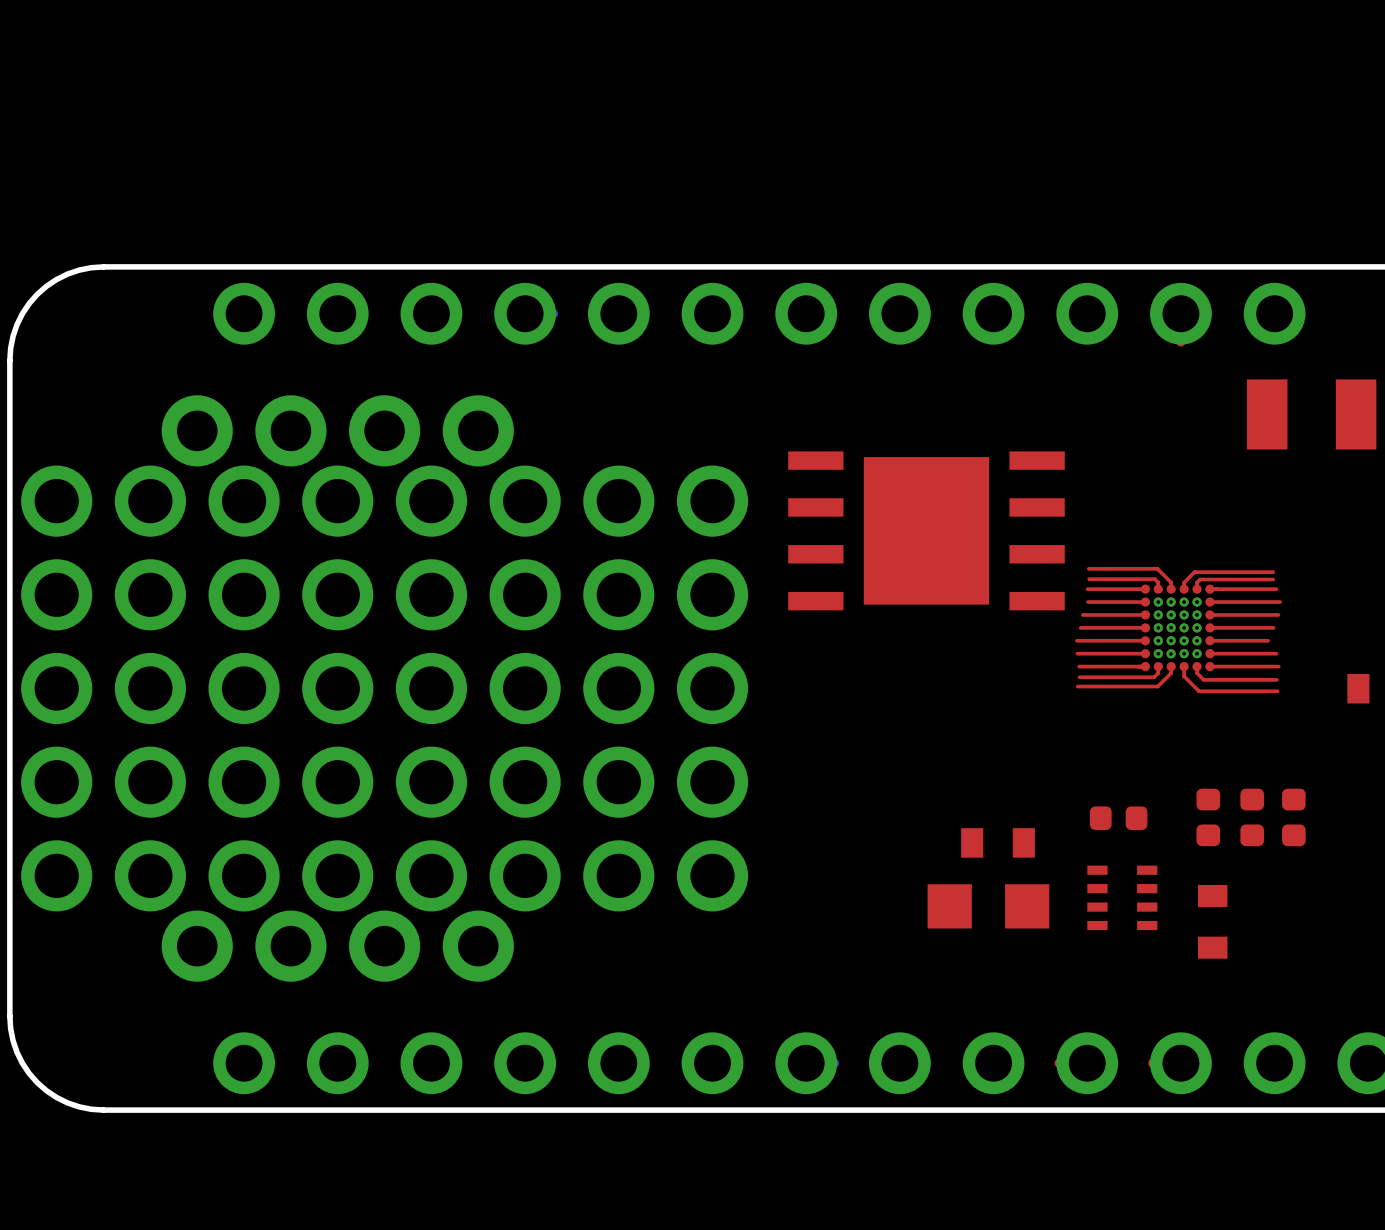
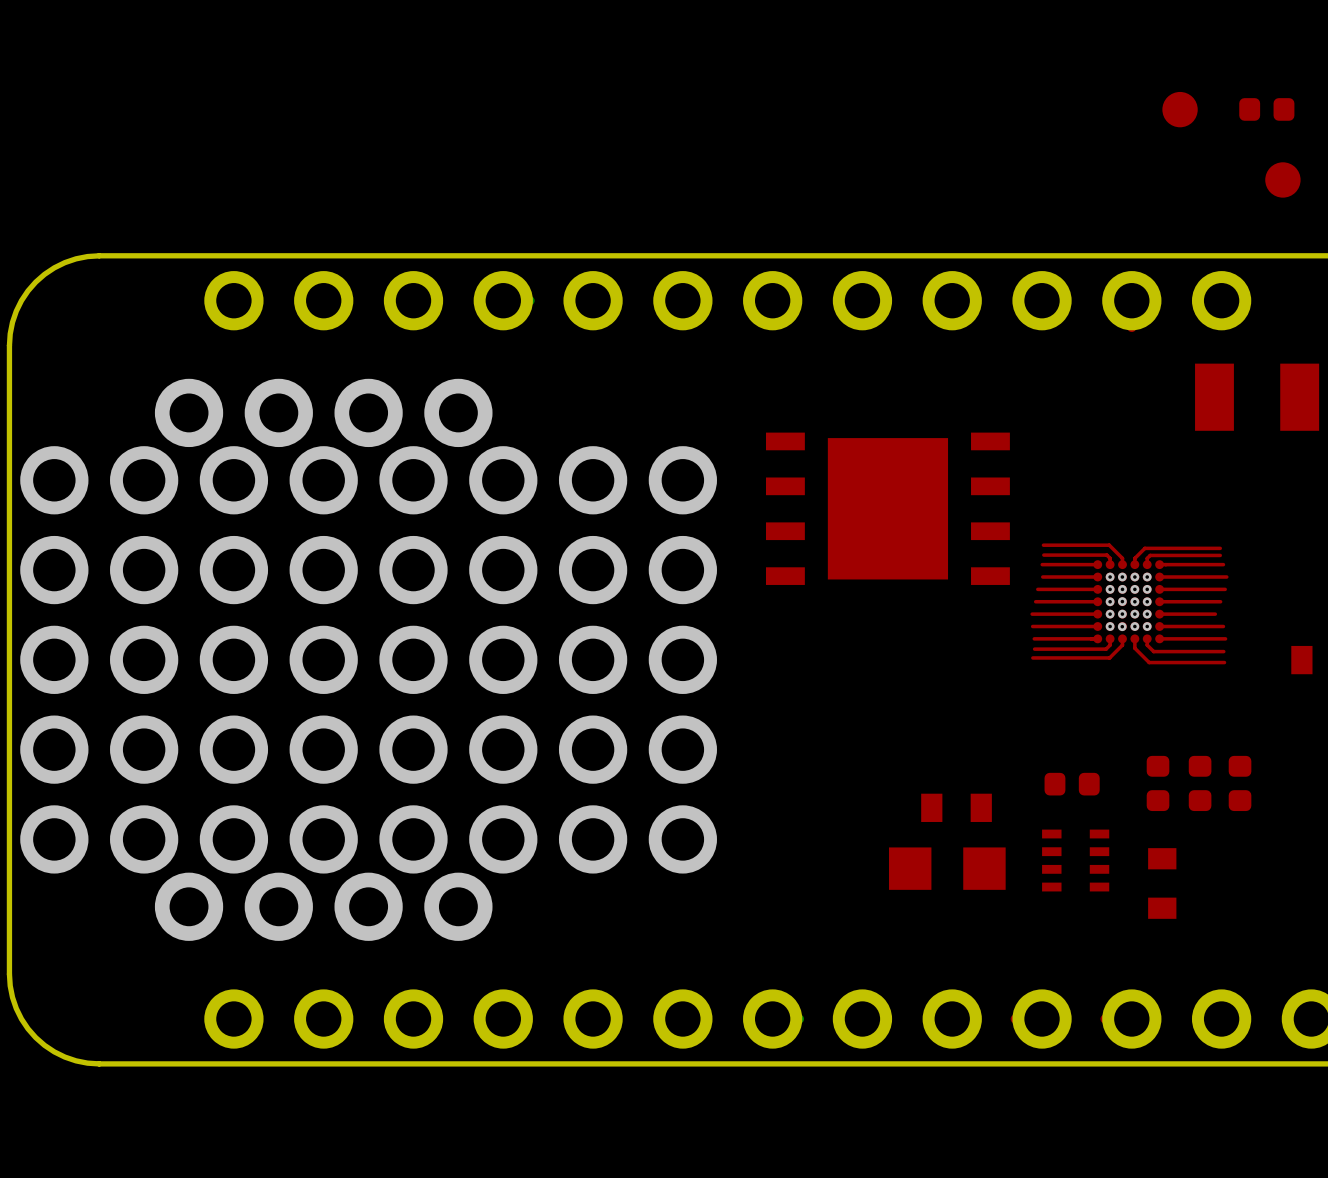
part: none -> (1180, 109)
part: none -> (1266, 109)
part: none -> (1282, 179)
part footprint: [788, 451, 1065, 611] -> [765, 432, 1010, 585]

